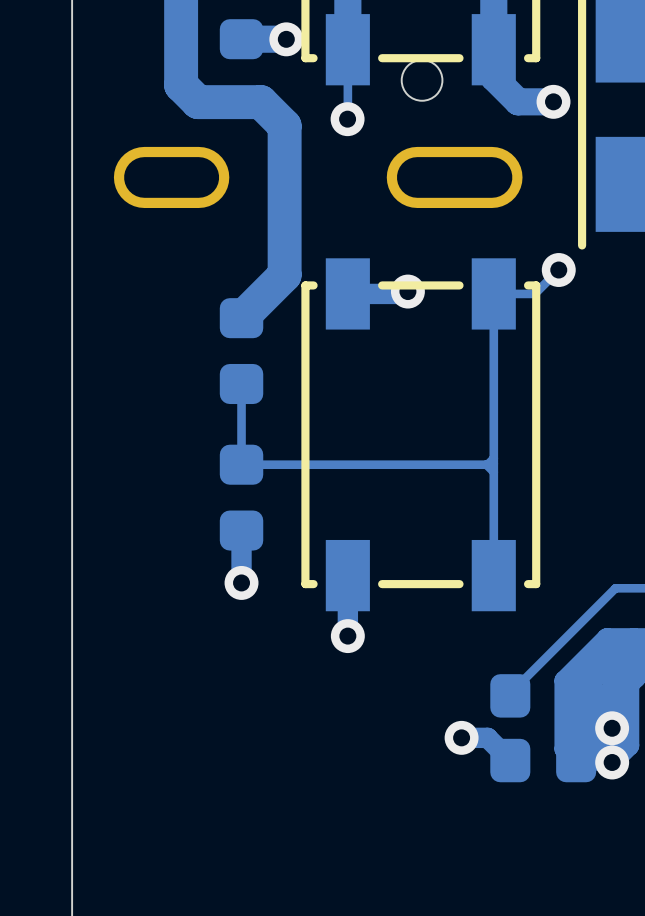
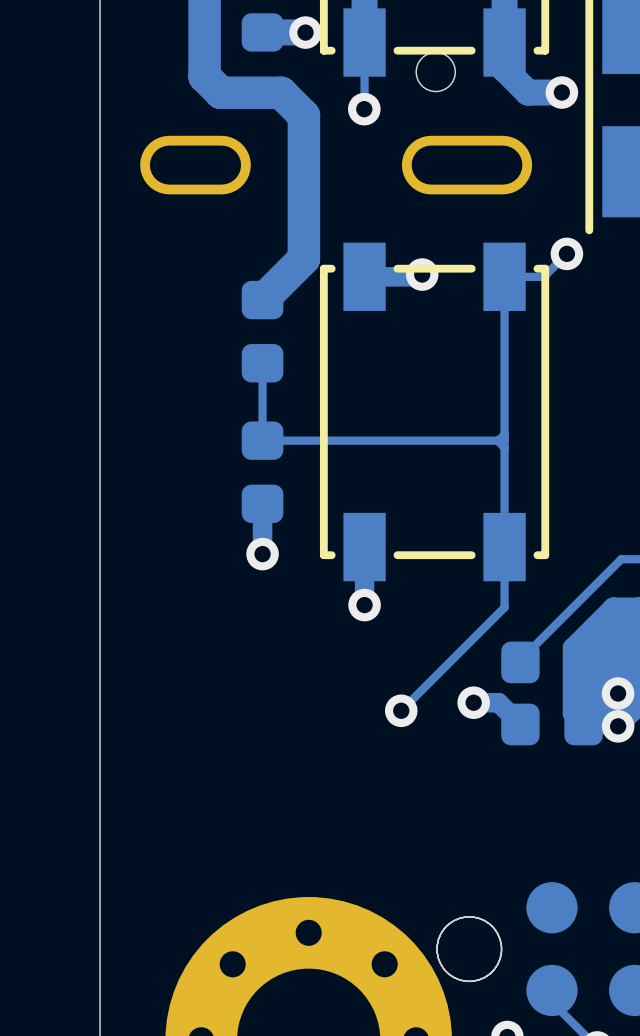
track: none -> (504, 547) (504, 607) (401, 710)
via: none -> (401, 710)

